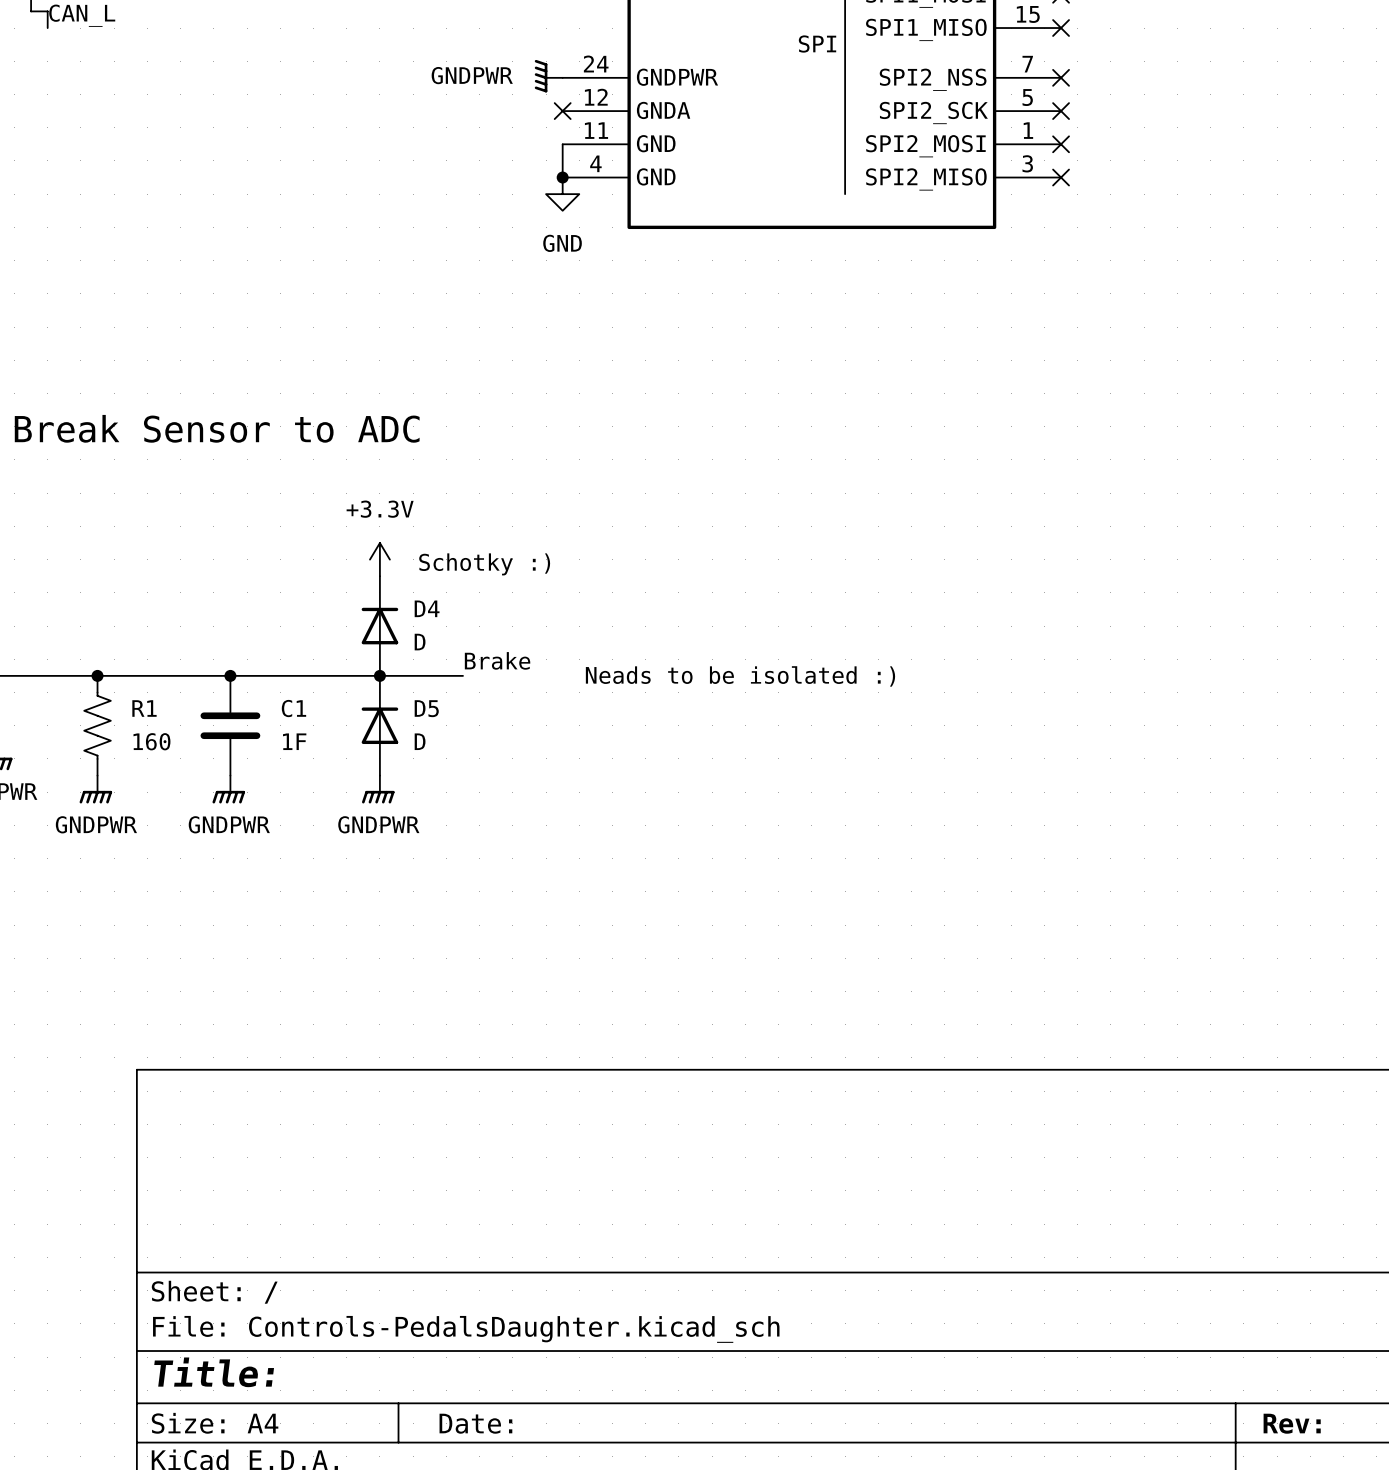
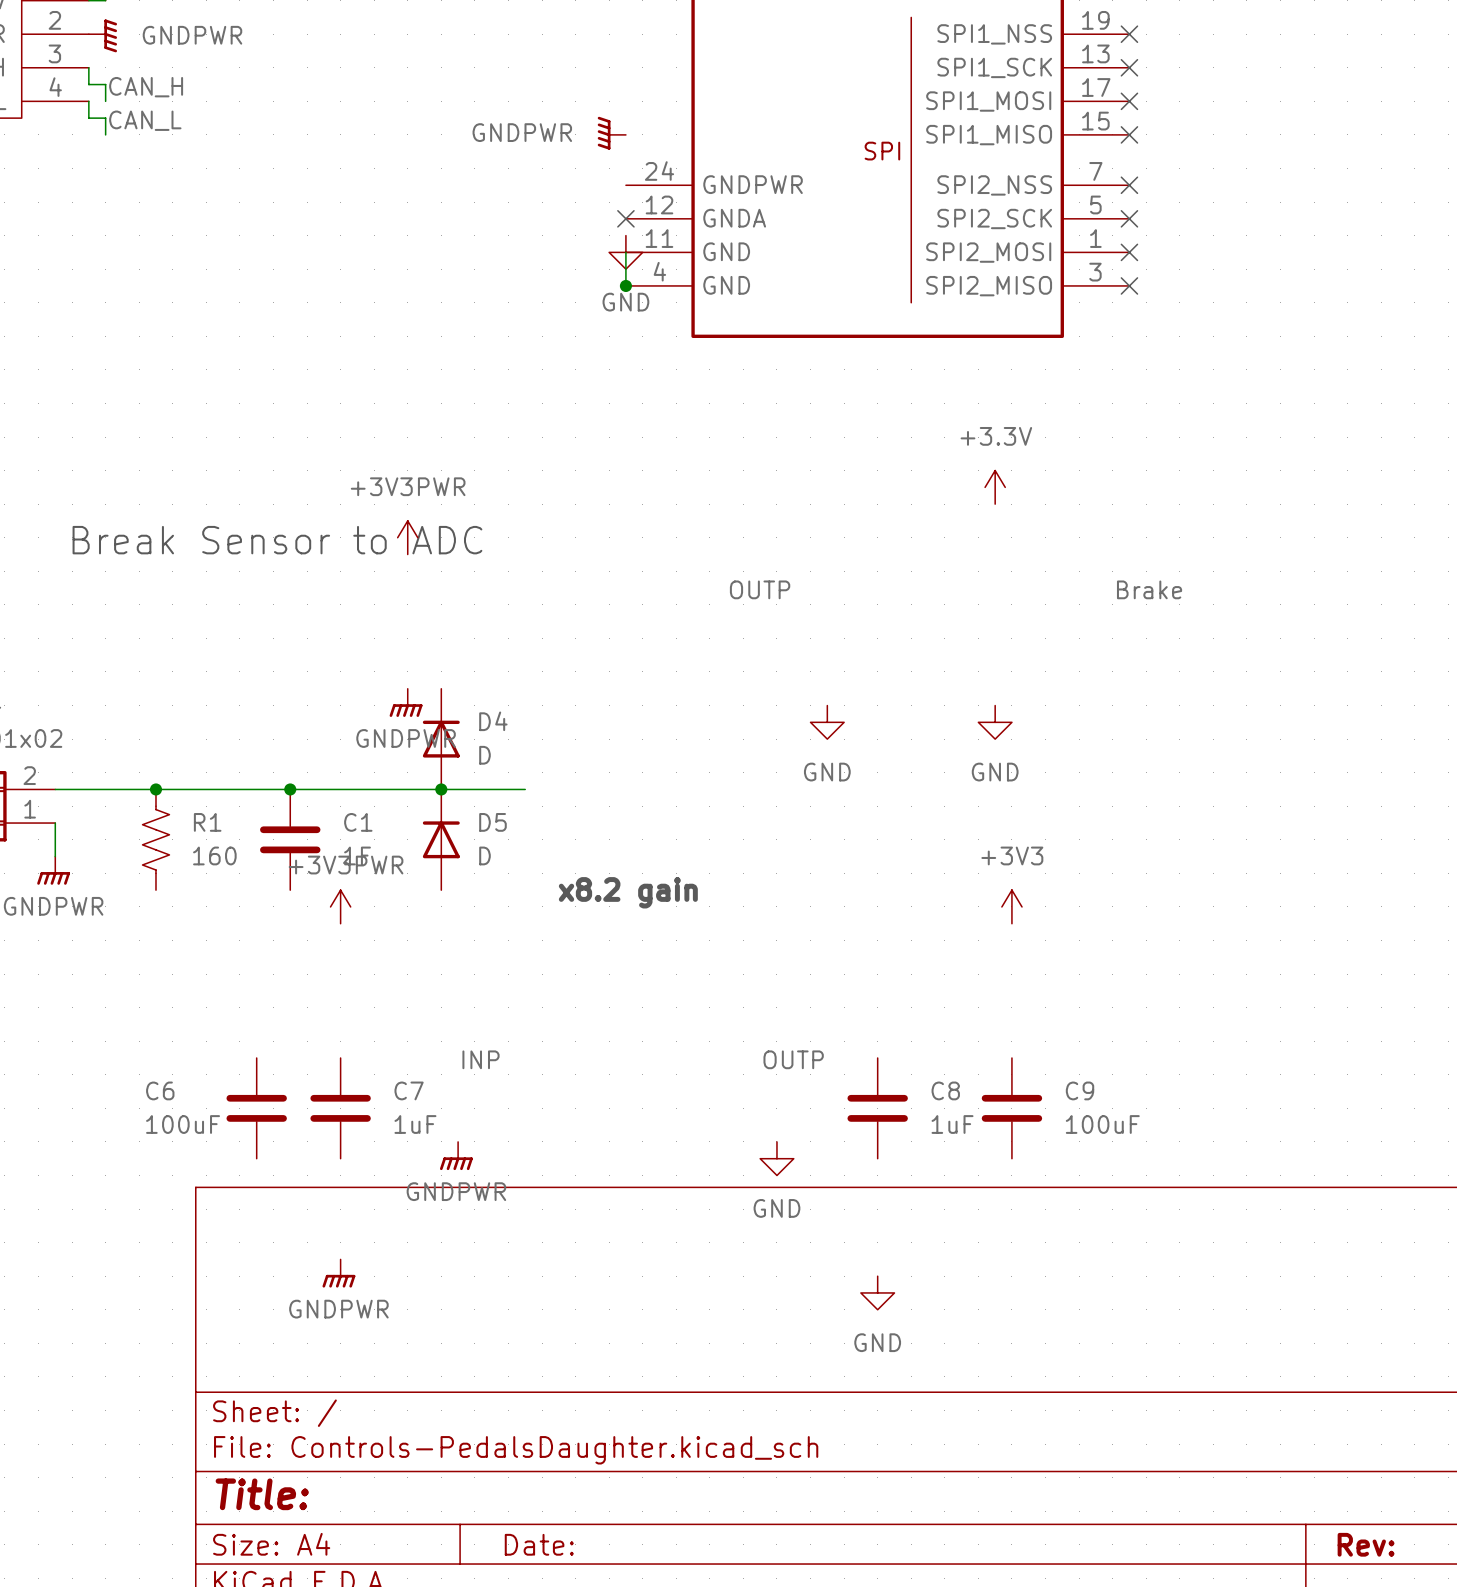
power symbol position: GNDPWR (548, 76) -> GNDPWR (611, 133)
power symbol position: GND (562, 194) -> GND (625, 252)
power symbol: none -> +3.3V (995, 487)
power symbol: none -> +3V3PWR (407, 537)
label: none -> OUTP (760, 589)
label: none -> Brake (1149, 589)
power symbol: +3.3V (379, 559) -> none
text: Schotky :) (484, 564) -> none
power symbol: none -> GNDPWR (406, 702)
power symbol: none -> GND (827, 722)
power symbol: none -> GND (995, 722)
label: Brake (497, 660) -> none
text: Neads to be isolated :) (740, 676) -> none
text: none -> x8.2 gain (628, 892)
power symbol: GNDPWR (95, 789) -> none
power symbol: GNDPWR (228, 789) -> none
power symbol: GNDPWR (378, 789) -> none
power symbol: none -> +3V3PWR (340, 906)
power symbol: none -> +3V3 (1011, 906)
label: none -> INP (480, 1059)
label: none -> OUTP (793, 1059)
C6: none -> 100uF (256, 1108)
C7: none -> 1uF (340, 1108)
C8: none -> 1uF (877, 1108)
C9: none -> 100uF (1011, 1108)
power symbol: none -> GNDPWR (456, 1156)
power symbol: none -> GND (776, 1158)
power symbol: none -> GNDPWR (338, 1273)
power symbol: none -> GND (877, 1292)

